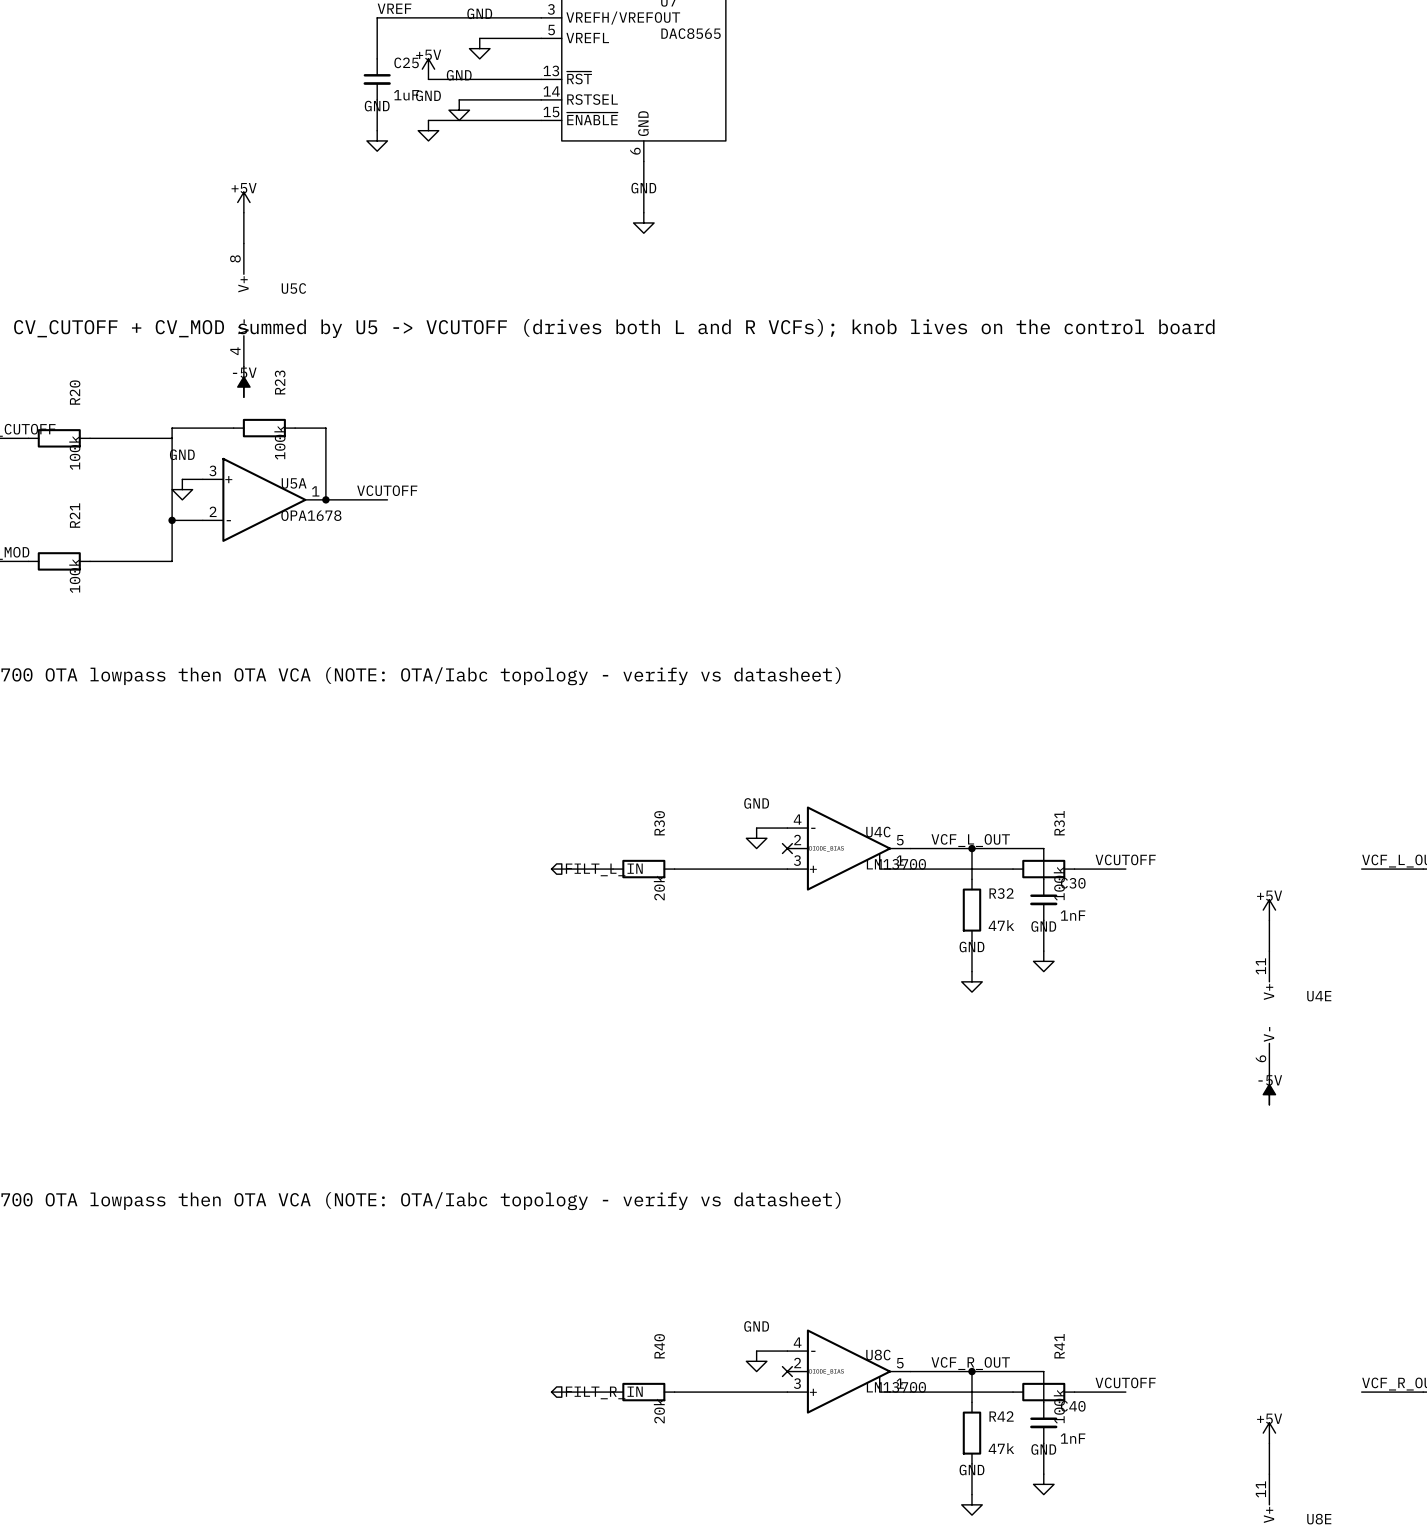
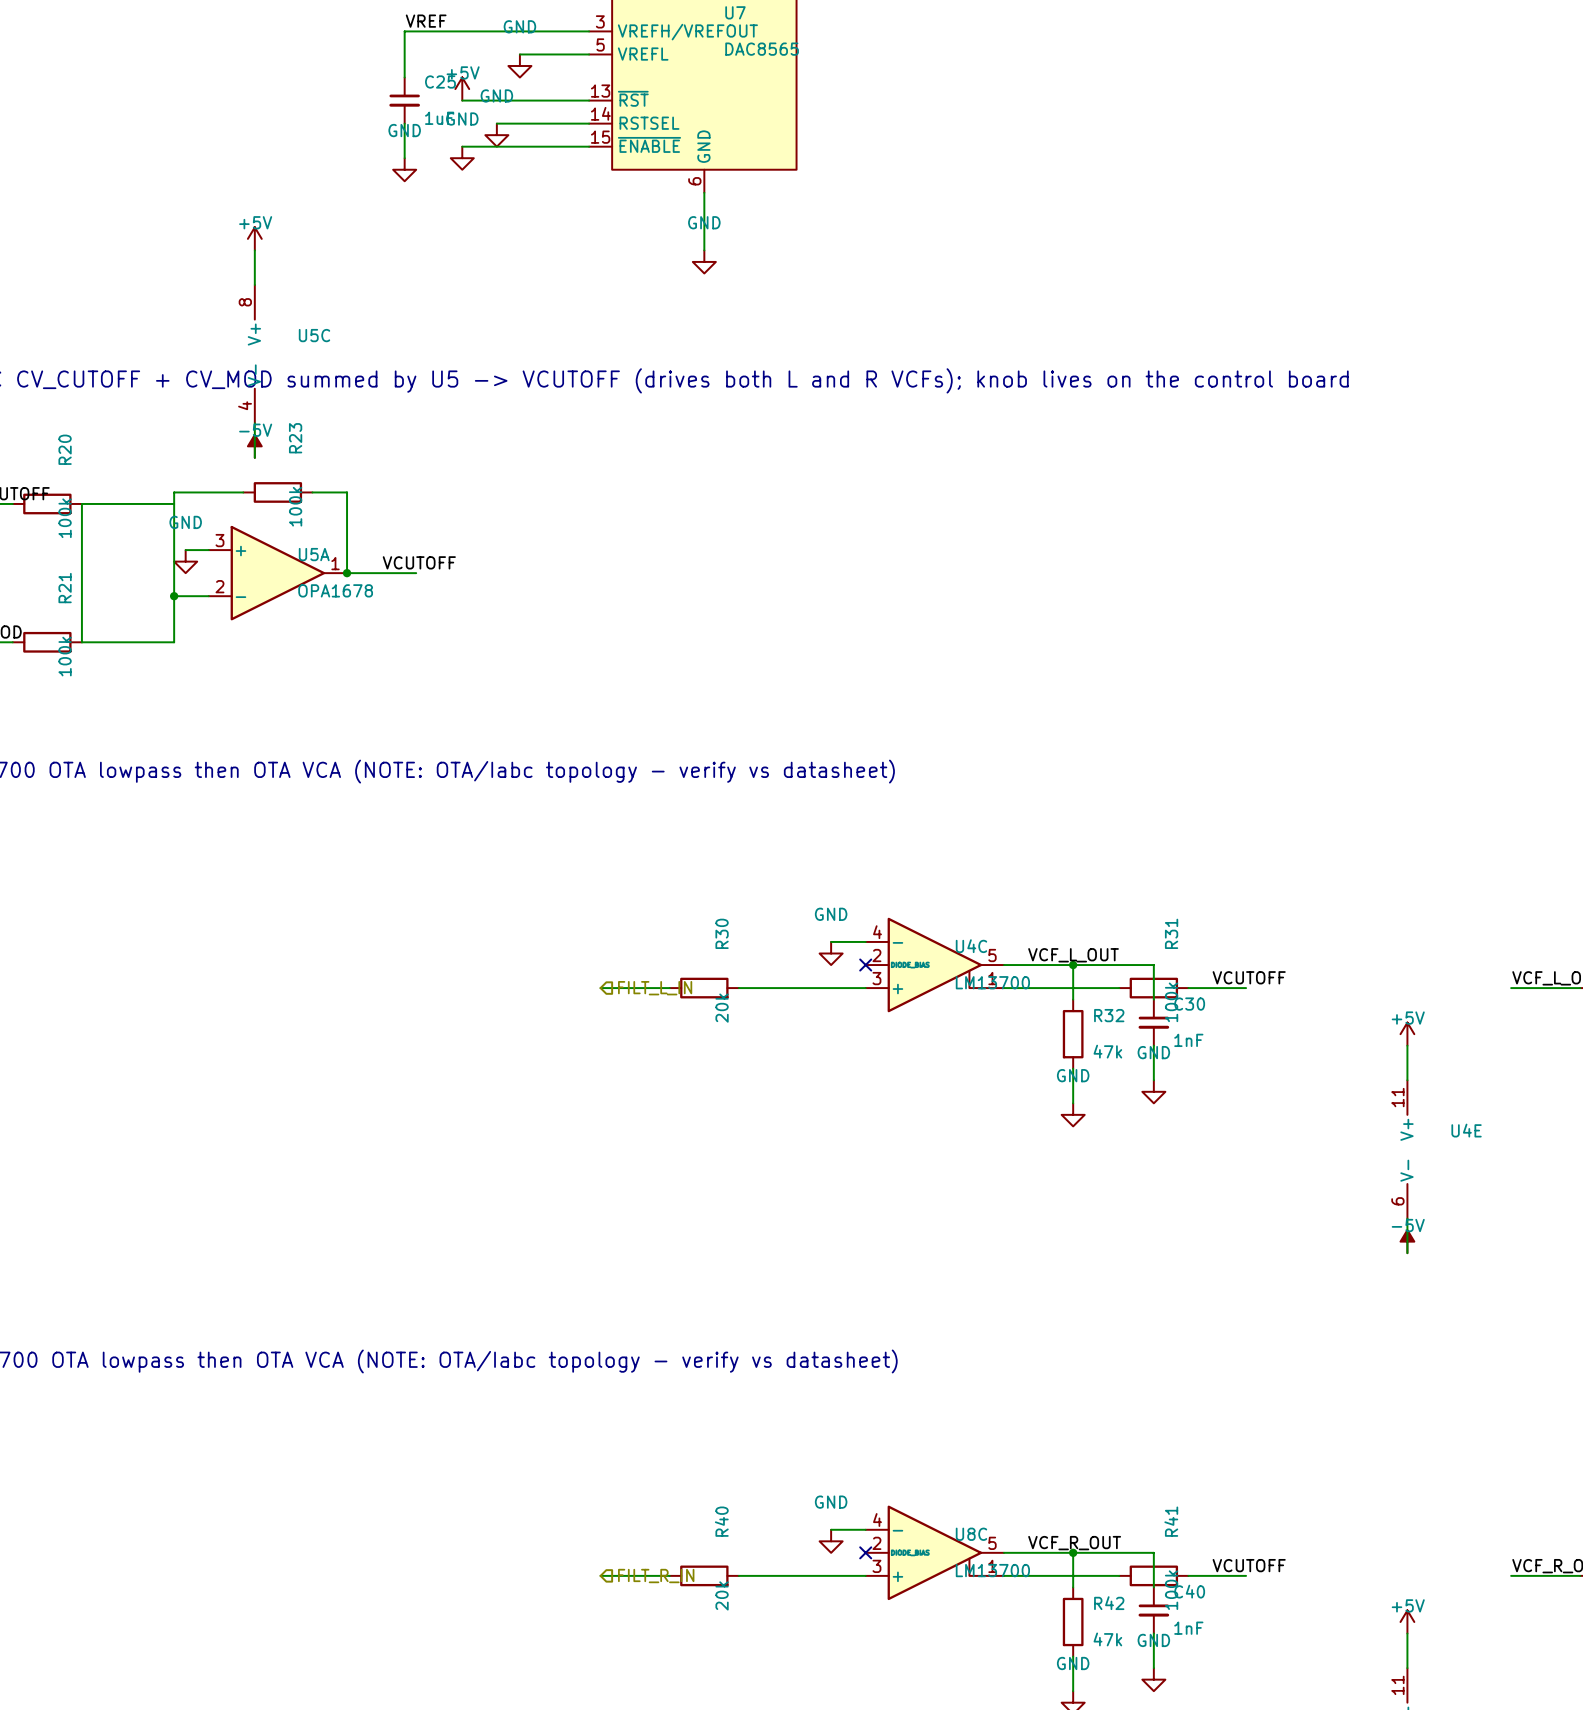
wire: none -> (81, 503) (81, 642)

